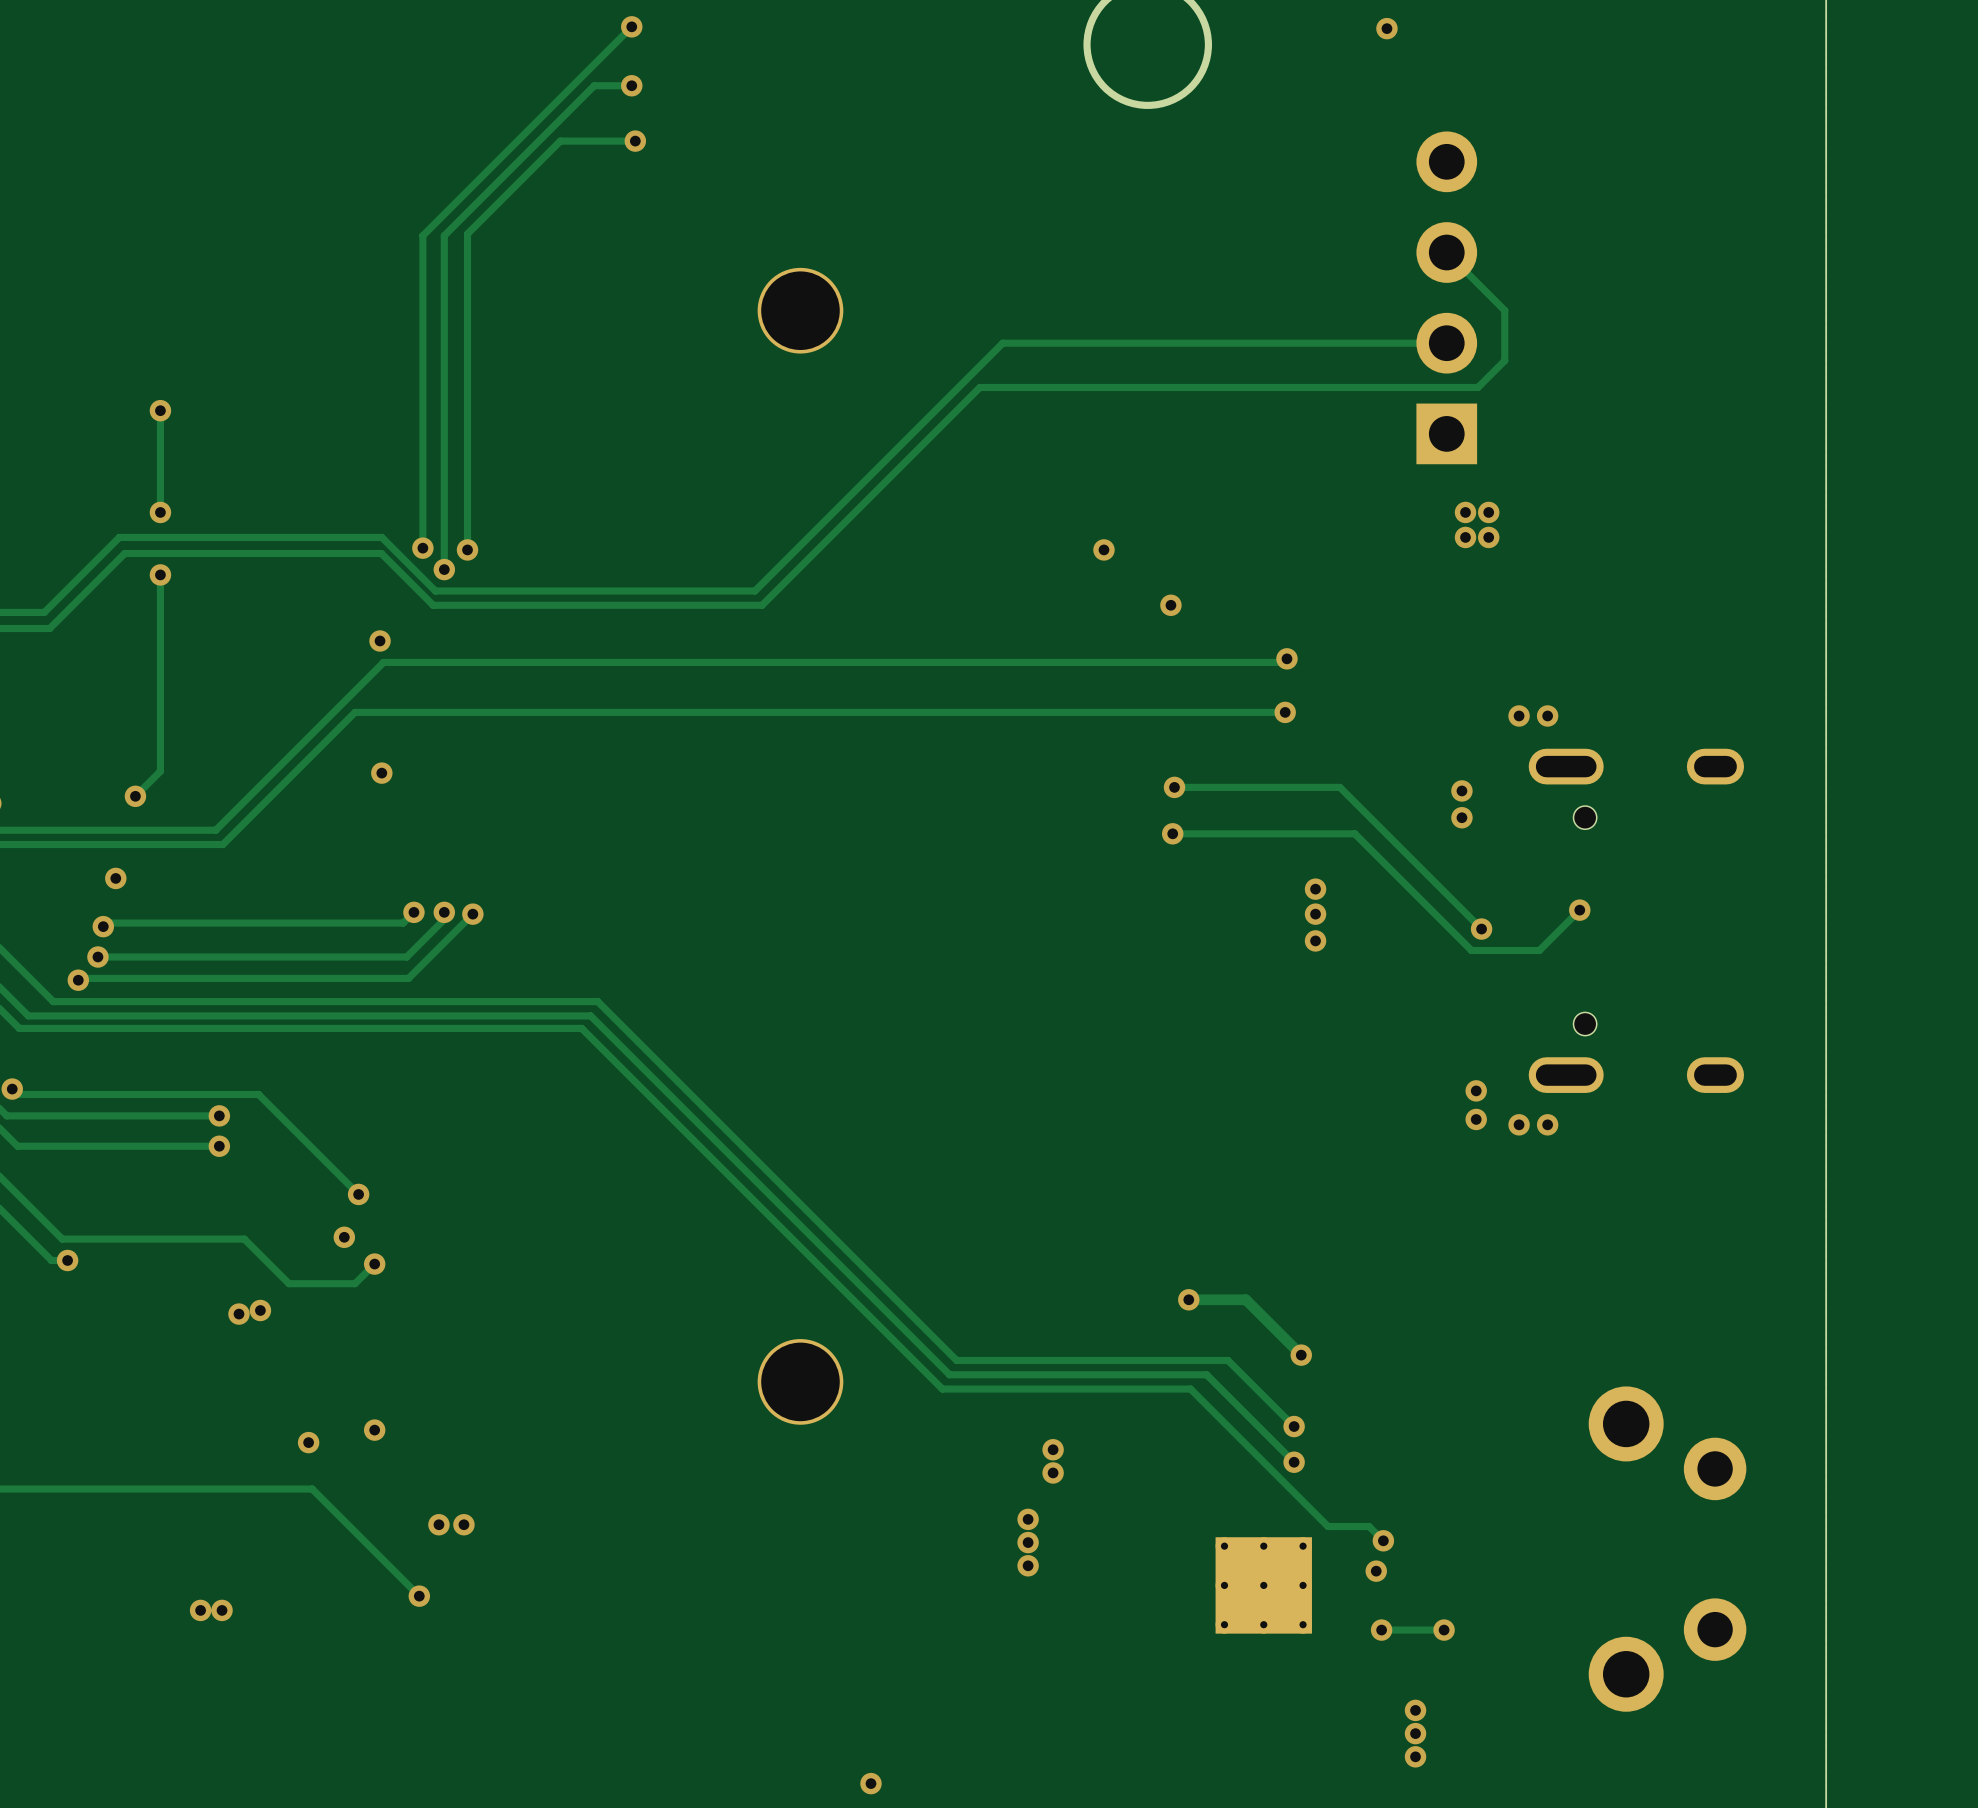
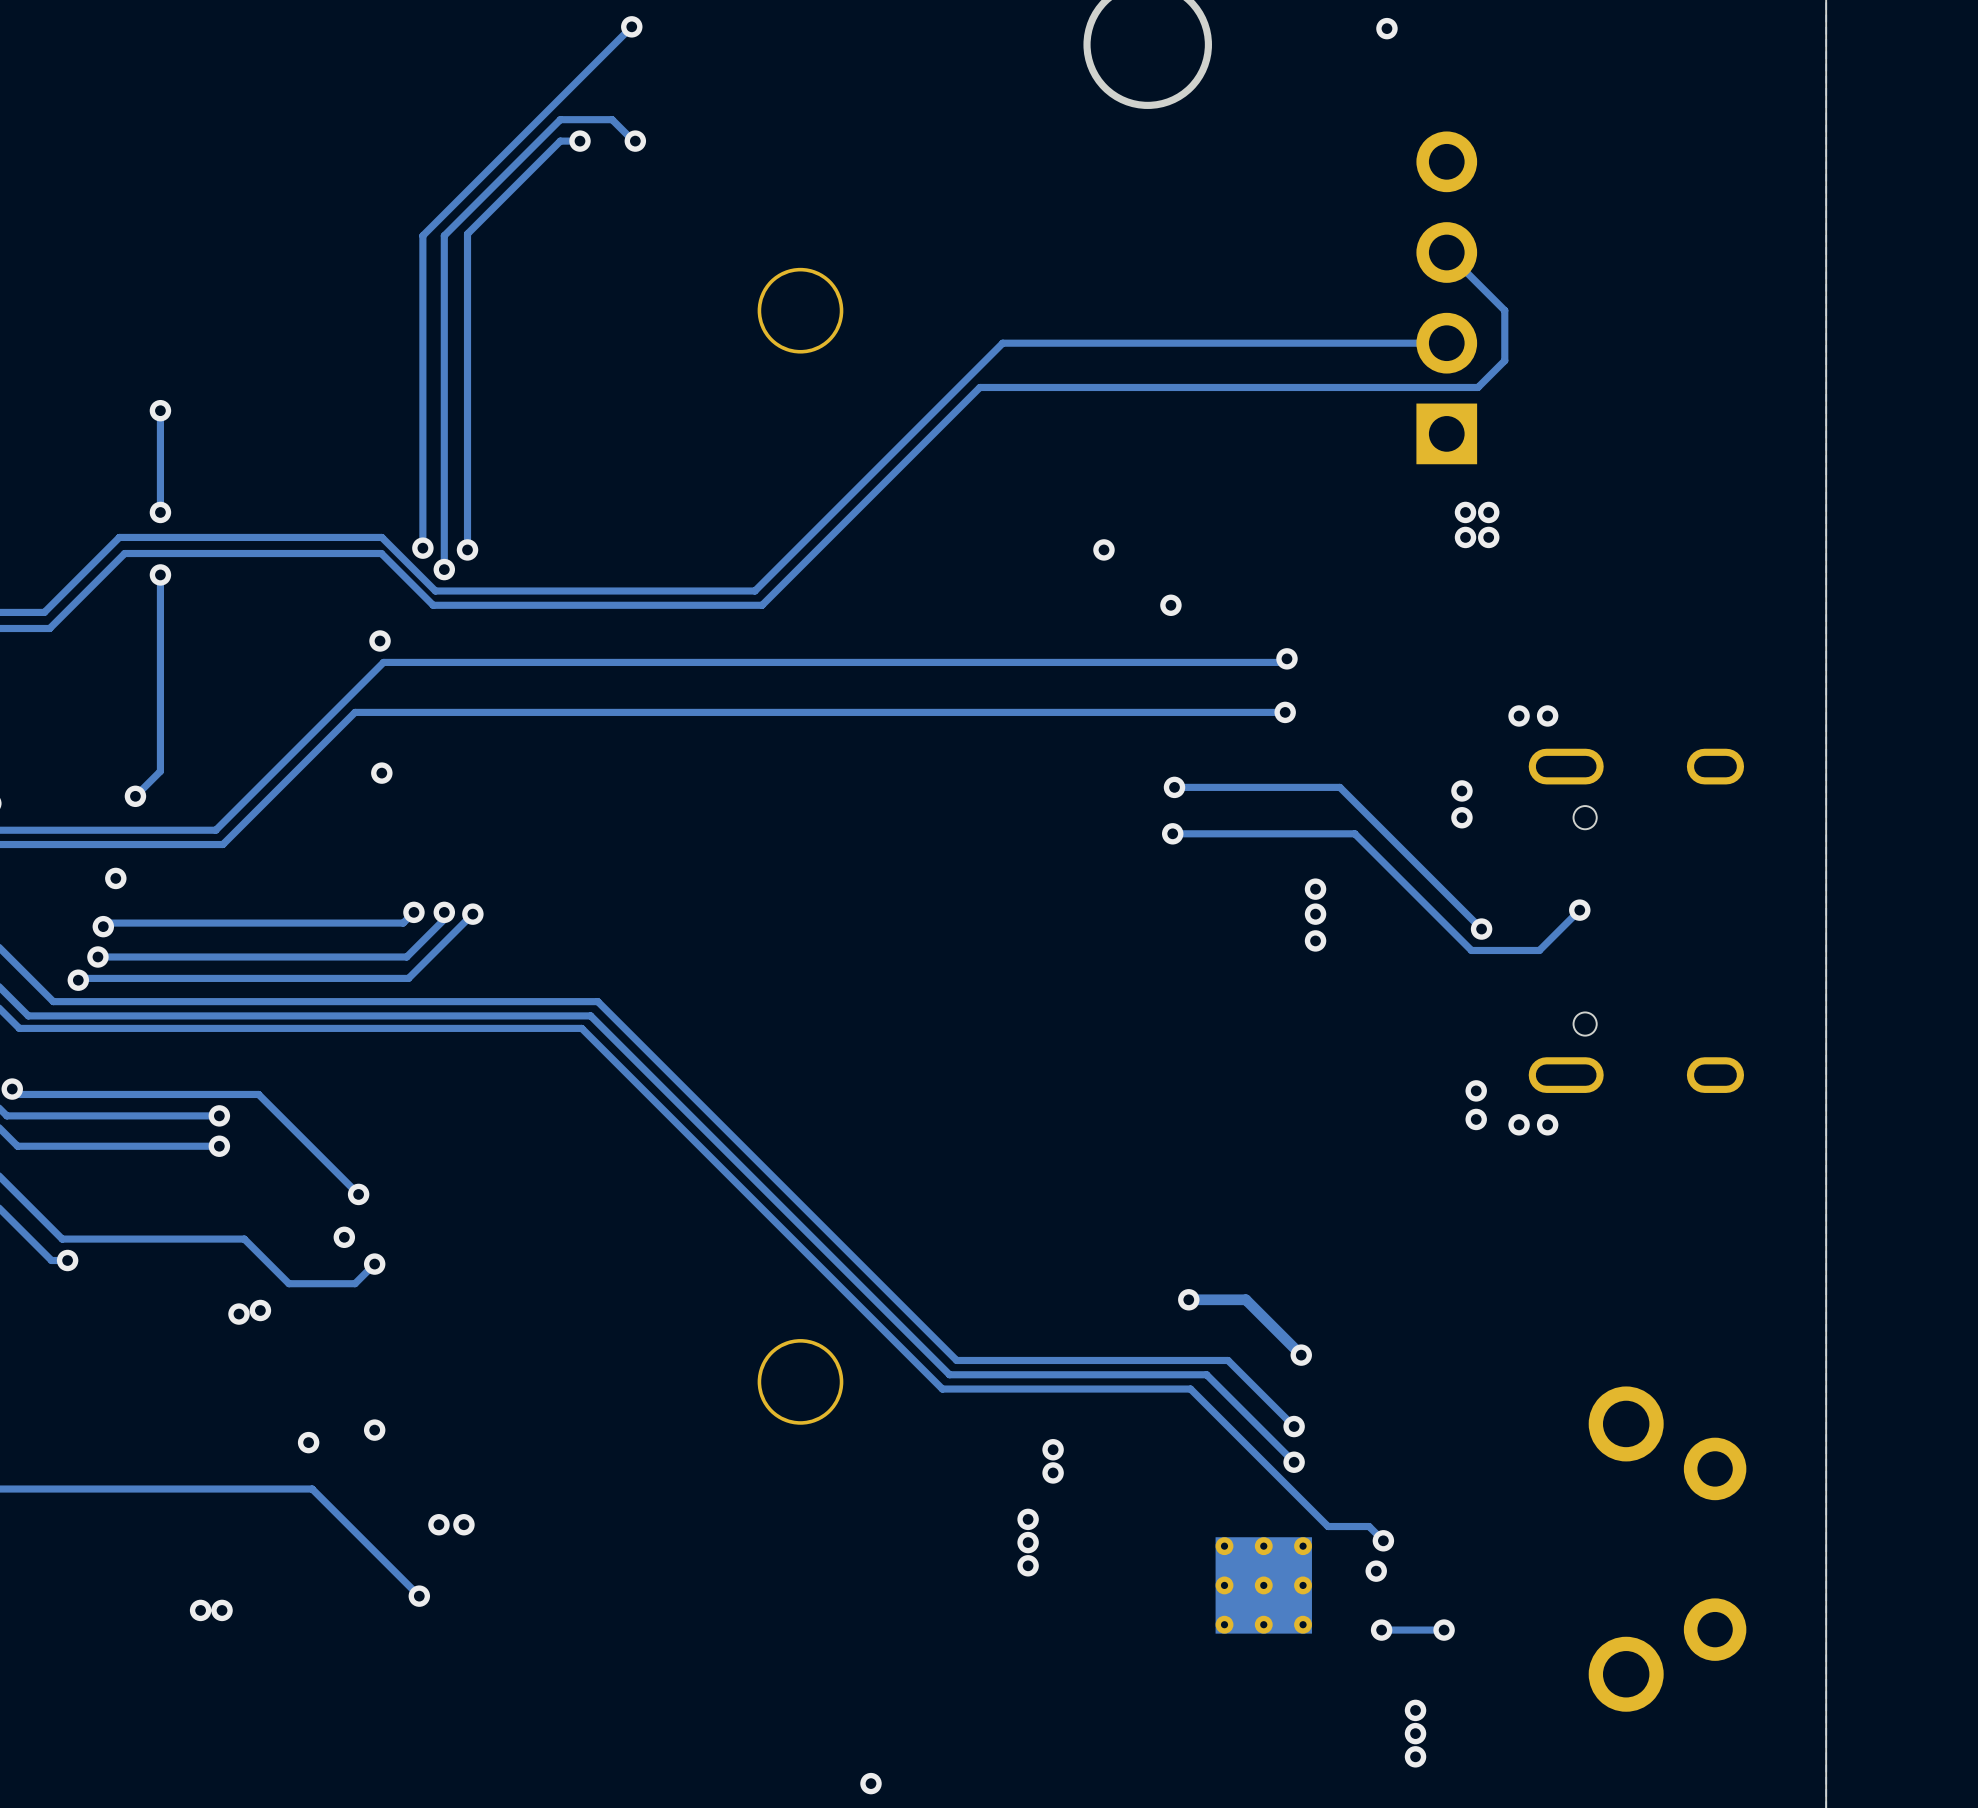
track: (631, 85) (594, 85) (560, 119) -> (633, 141) (612, 119) (560, 119)
via position: (631, 85) -> (579, 141)
track: (635, 141) (579, 141) -> none

